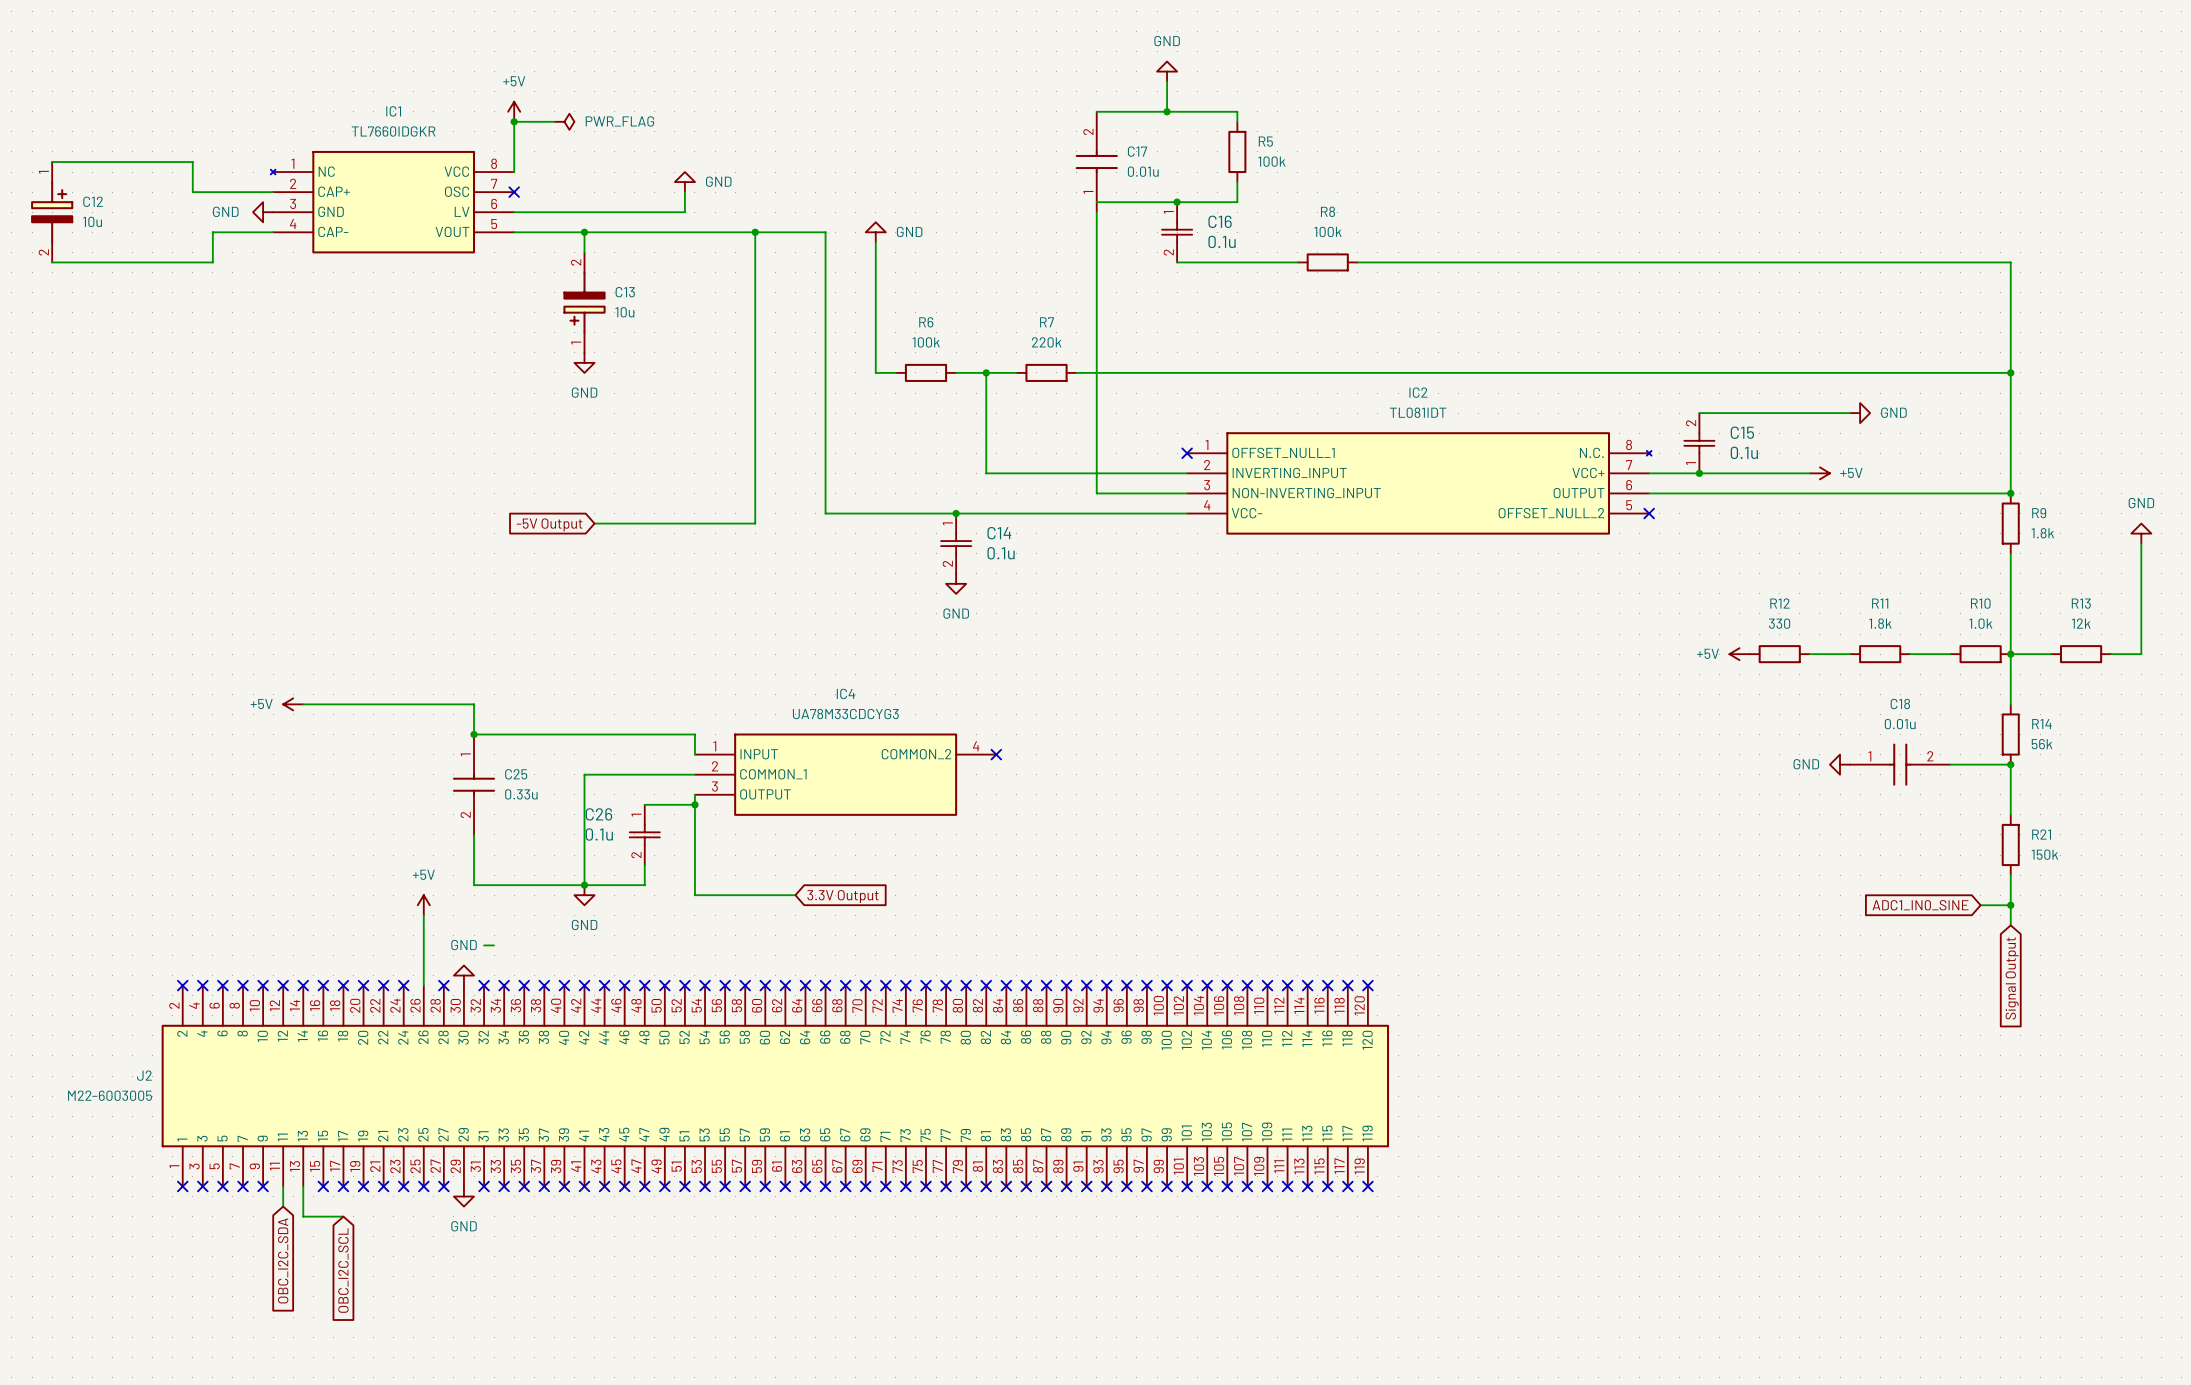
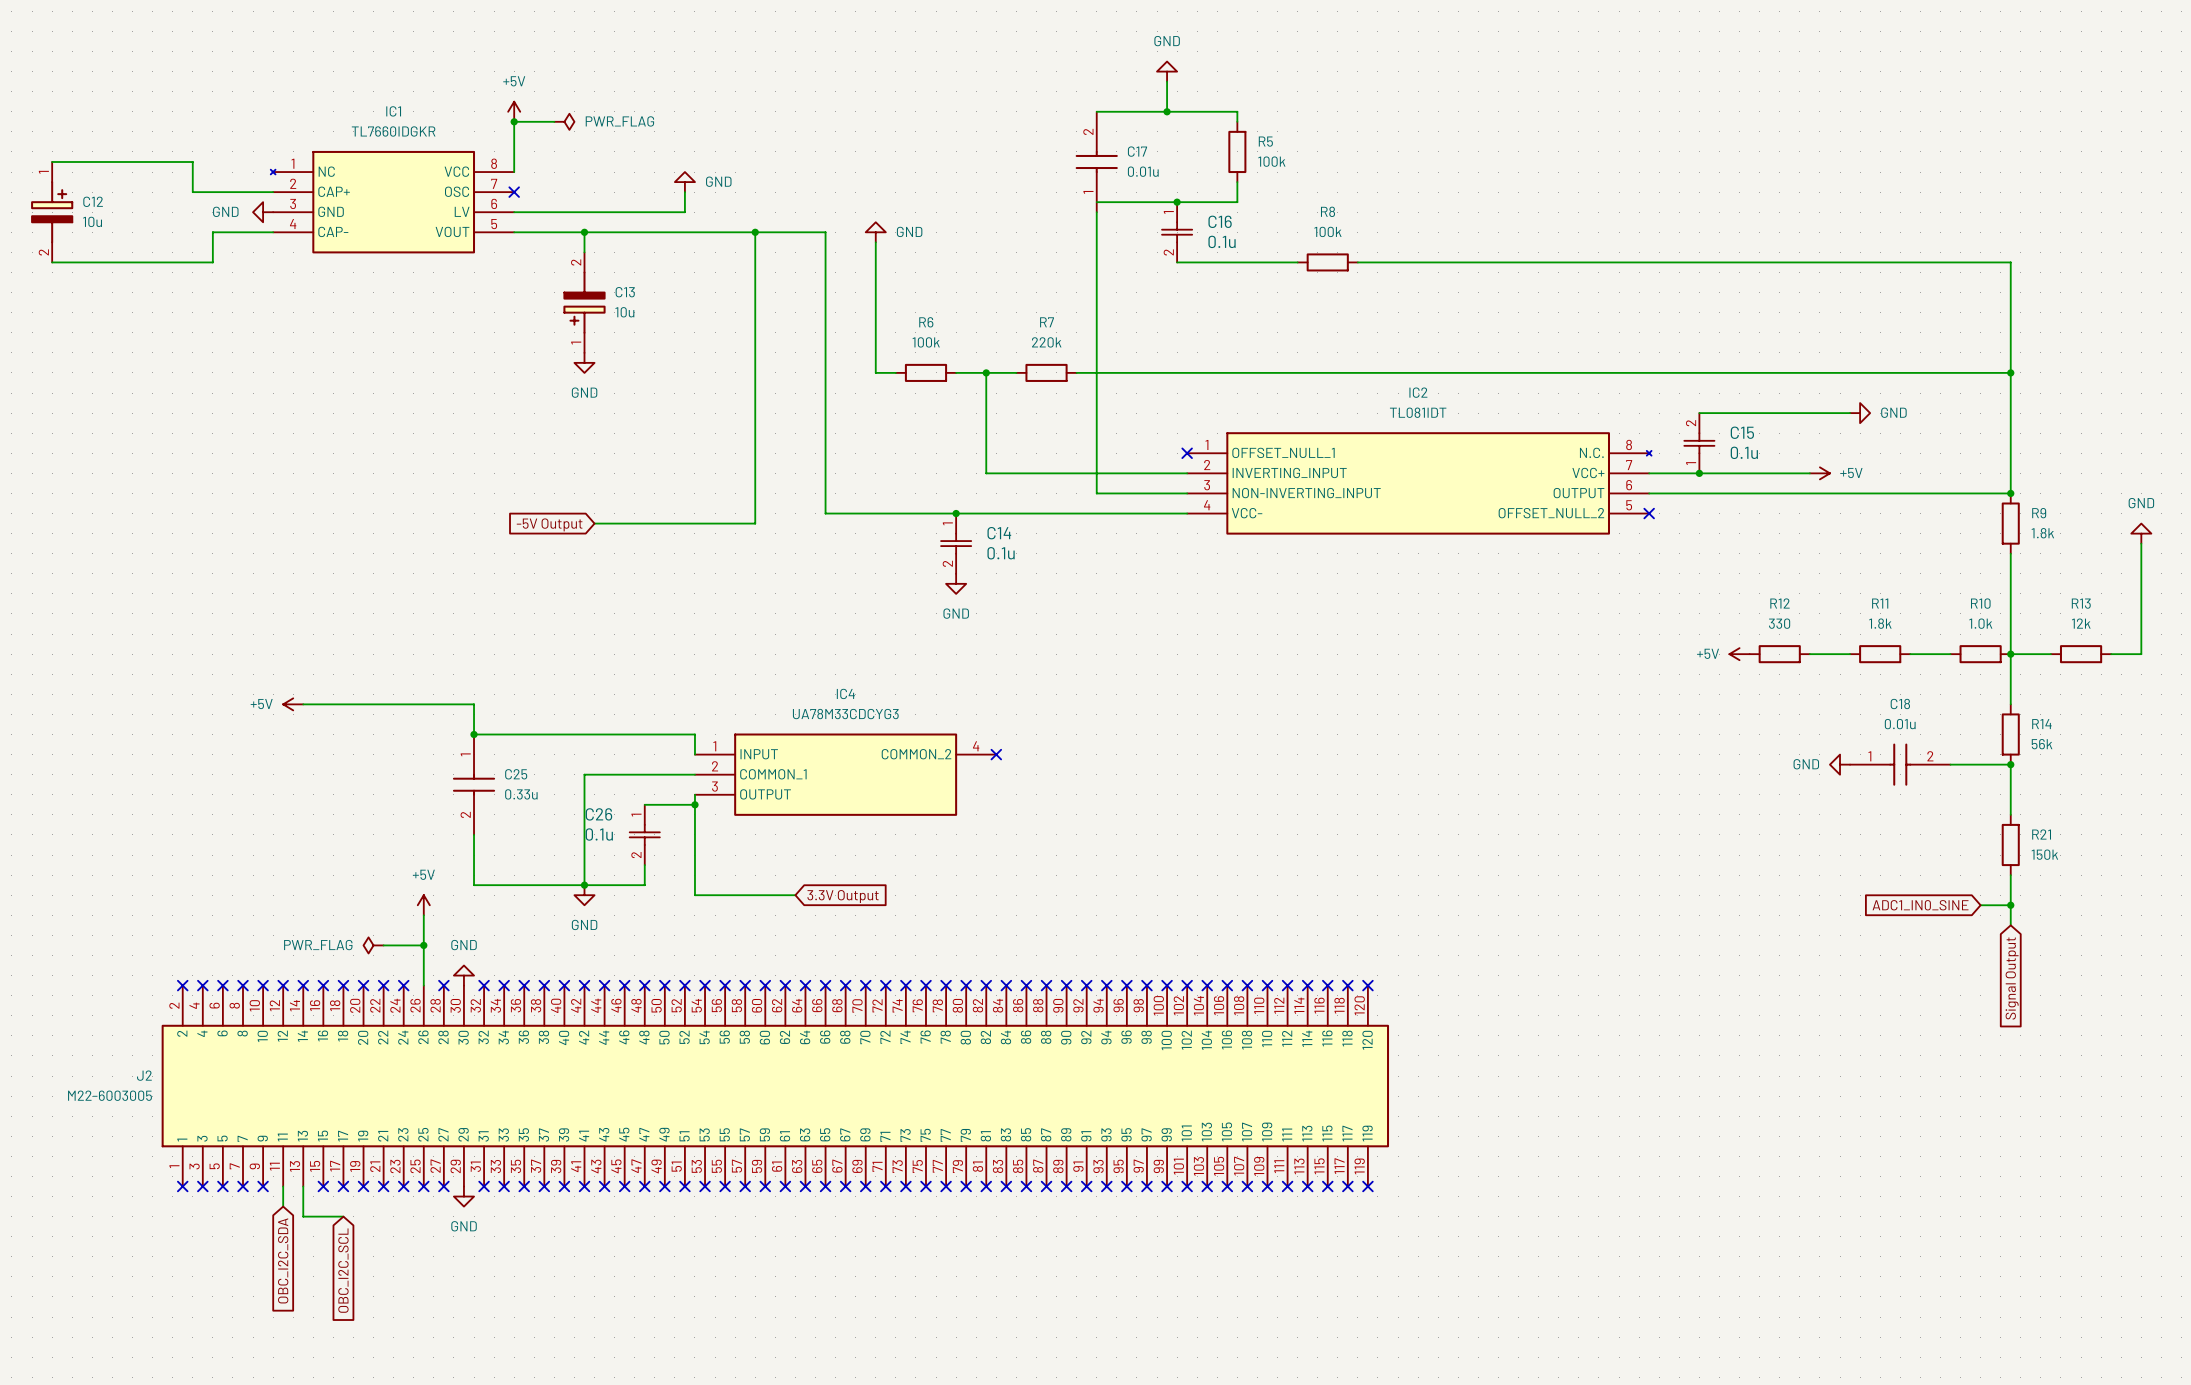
power symbol: none -> PWR_FLAG (373, 945)
wire: none -> (383, 945) (423, 945)
junction: none -> (423, 945)
wire: (484, 945) (494, 945) -> none

